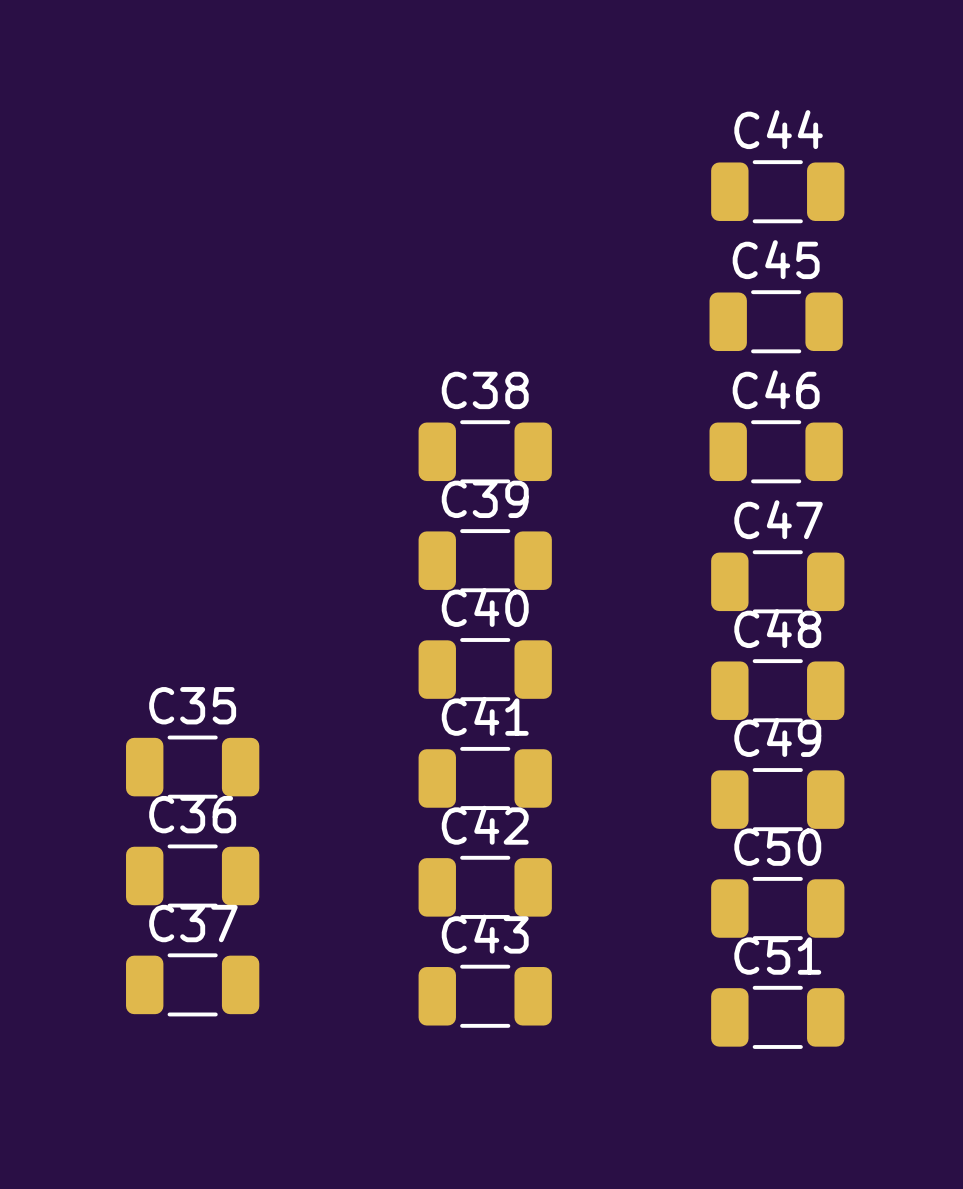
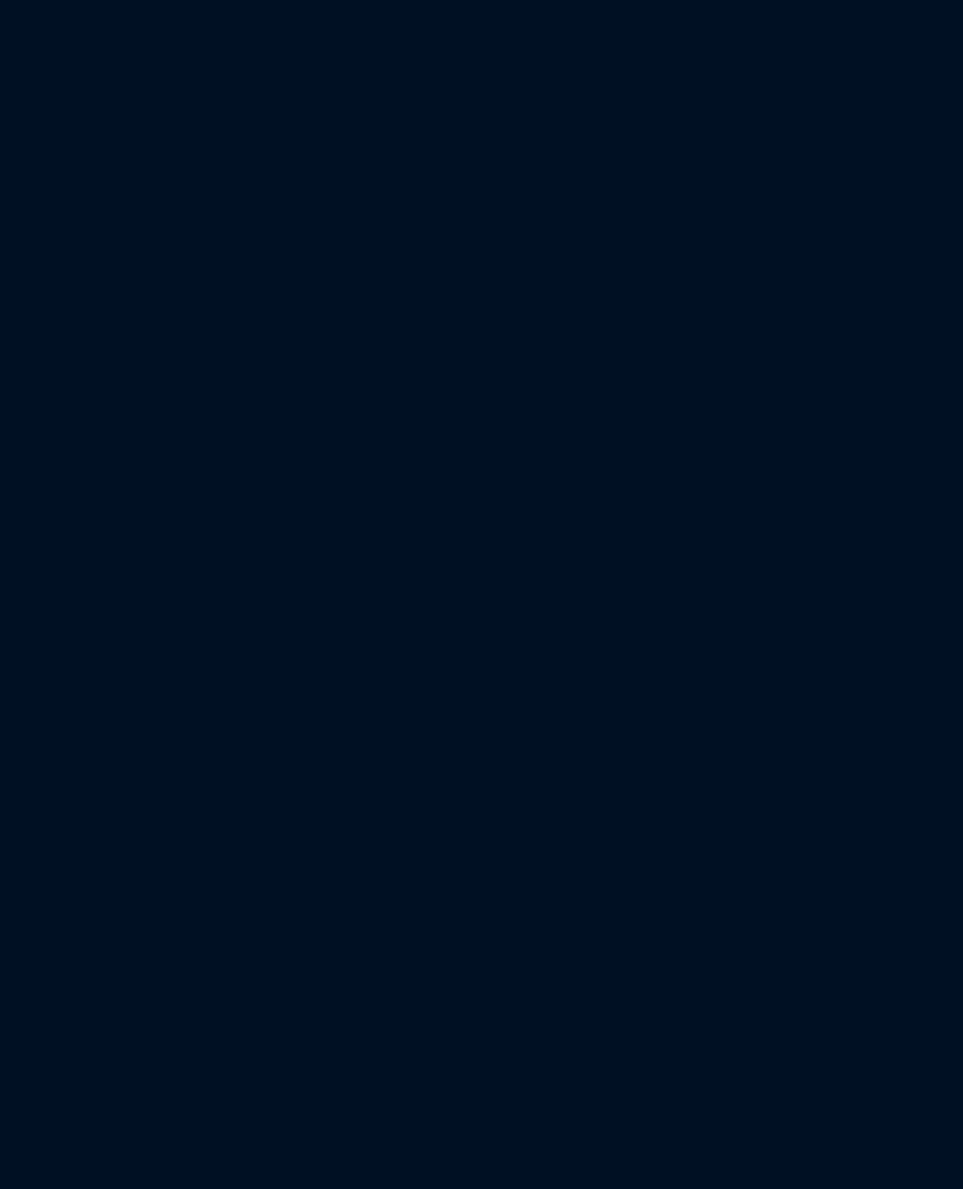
C44: (777, 191) -> none
C45: (776, 321) -> none
C38: (485, 451) -> none
C46: (776, 451) -> none
C39: (485, 560) -> none
C47: (777, 581) -> none
C40: (485, 669) -> none
C48: (777, 690) -> none
C35: (192, 767) -> none
C41: (485, 778) -> none
C49: (777, 799) -> none
C36: (192, 875) -> none
C42: (485, 887) -> none
C50: (777, 908) -> none
C37: (192, 984) -> none
C43: (485, 996) -> none
C51: (777, 1017) -> none

